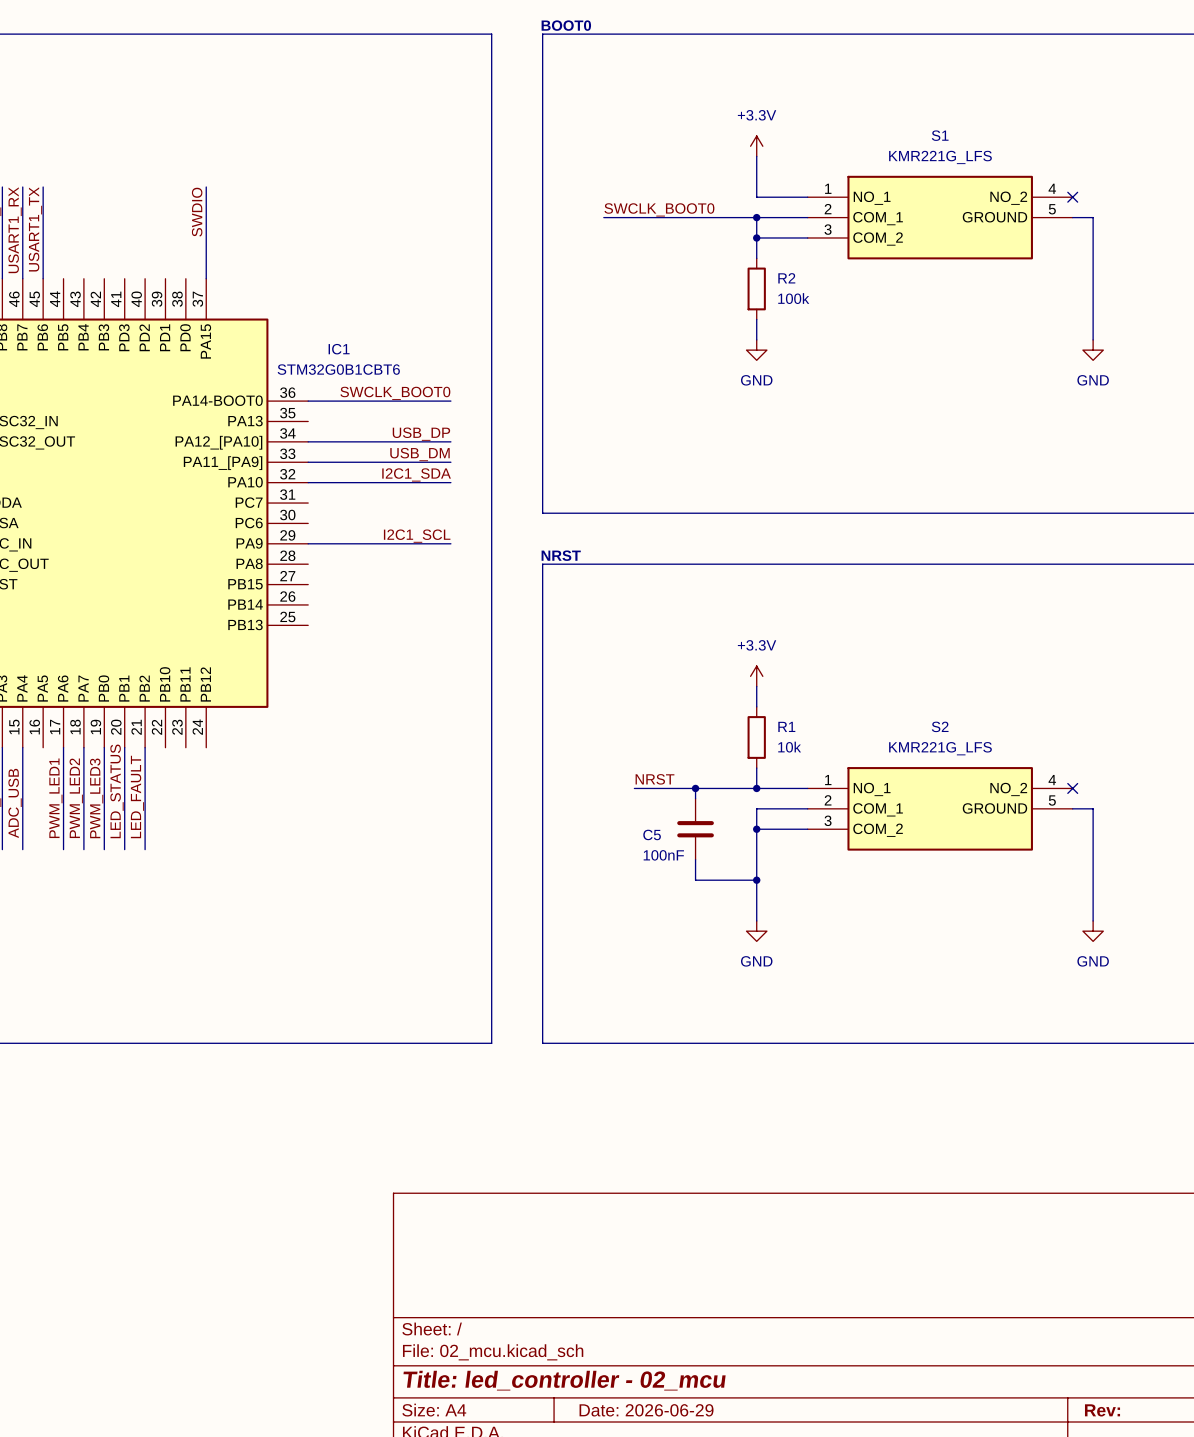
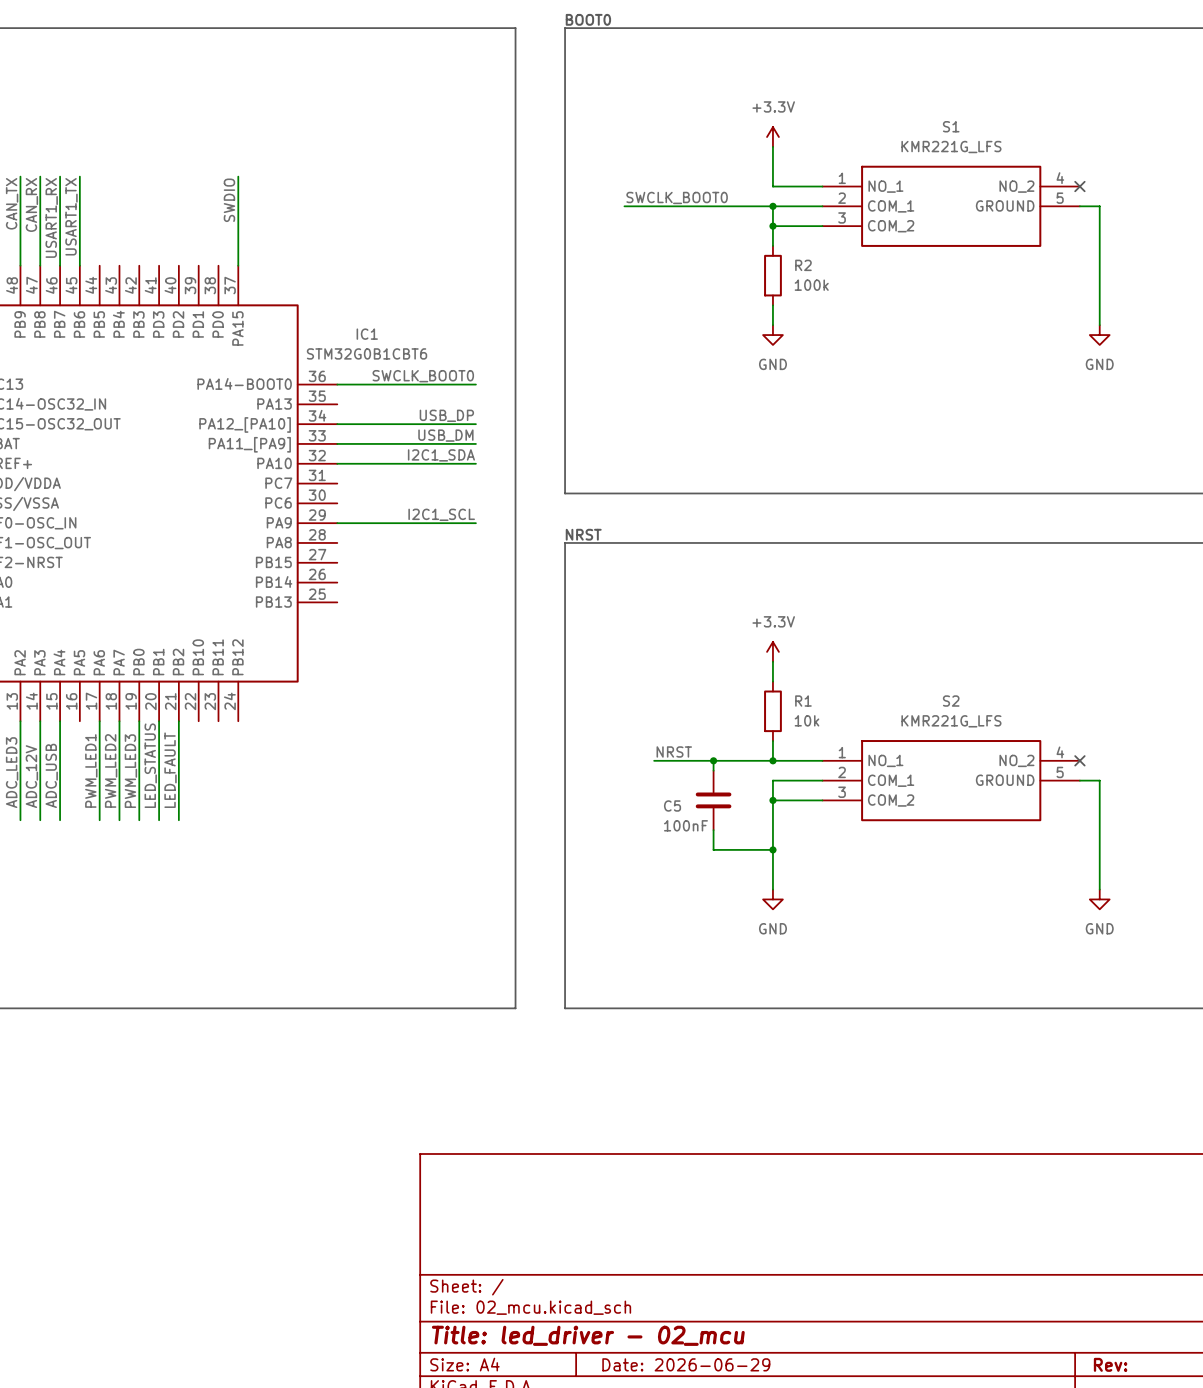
title block: Title: led_controller - 02_mcu (564, 1380) -> Title: led_driver - 02_mcu (588, 1335)

